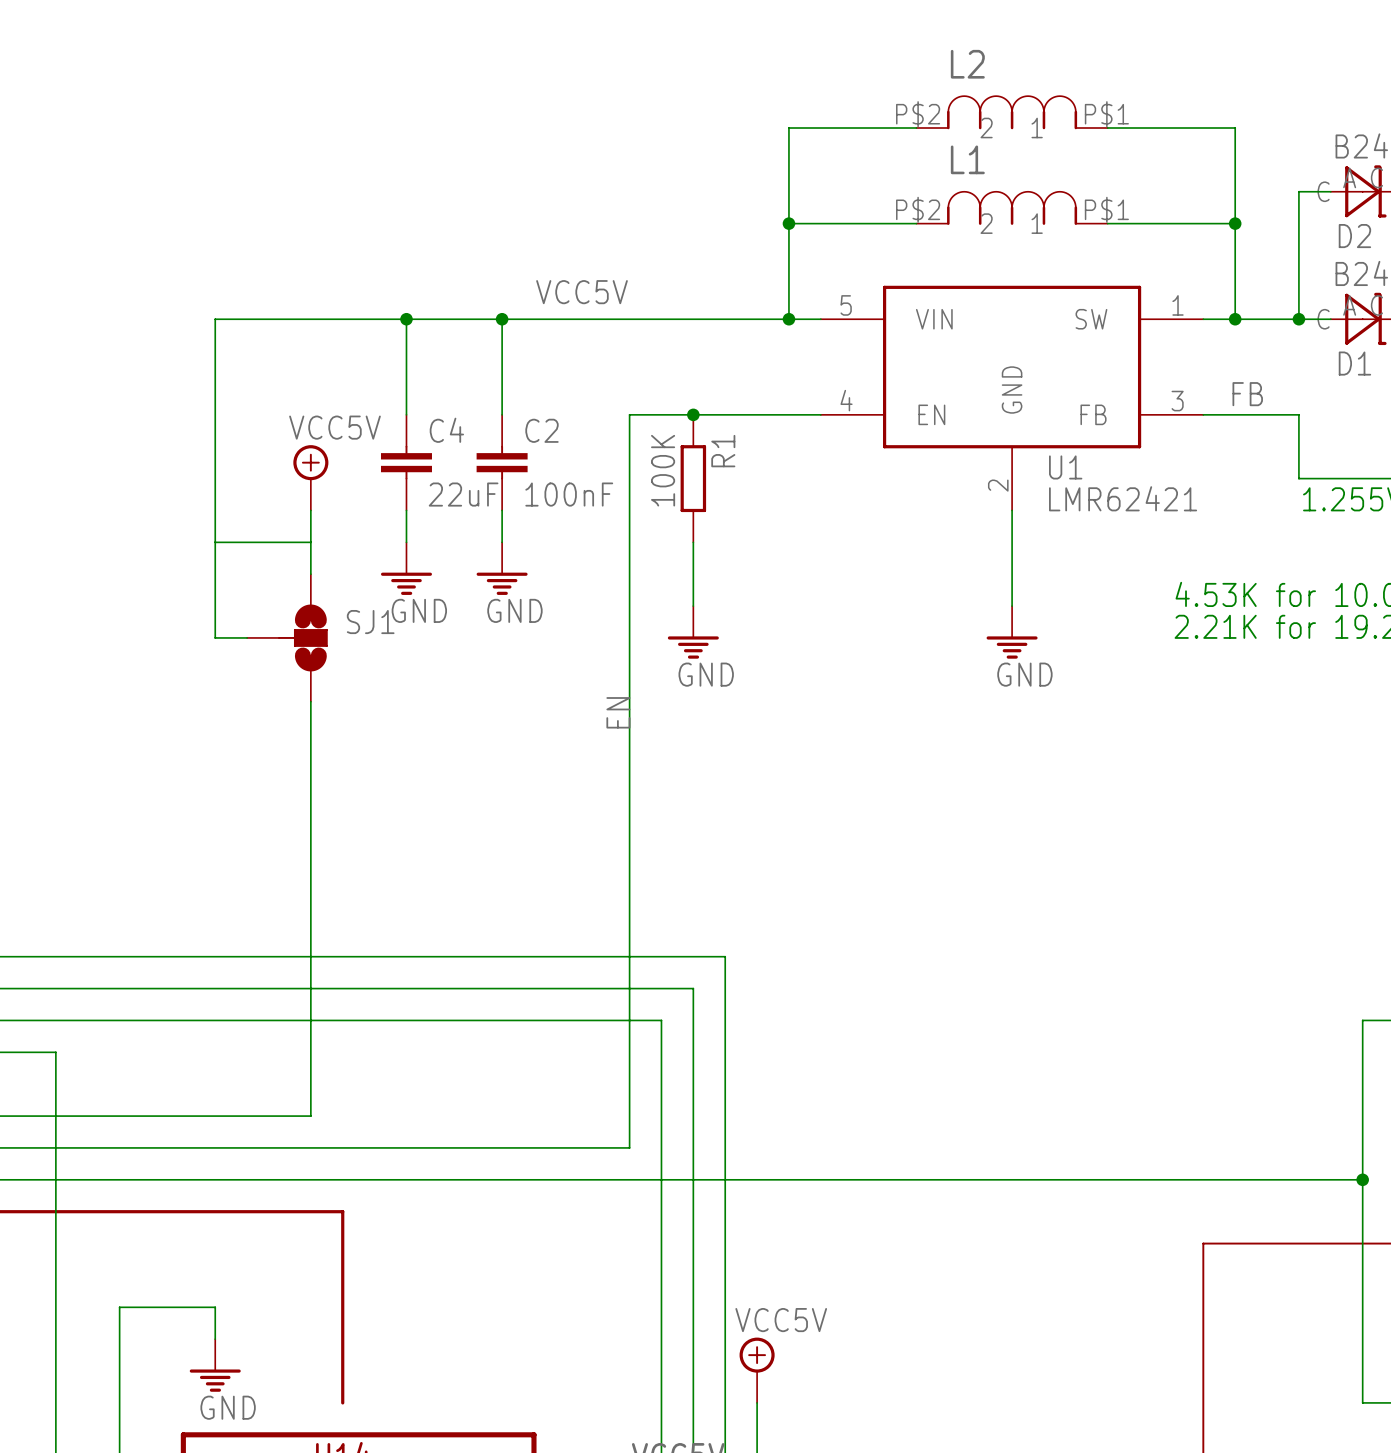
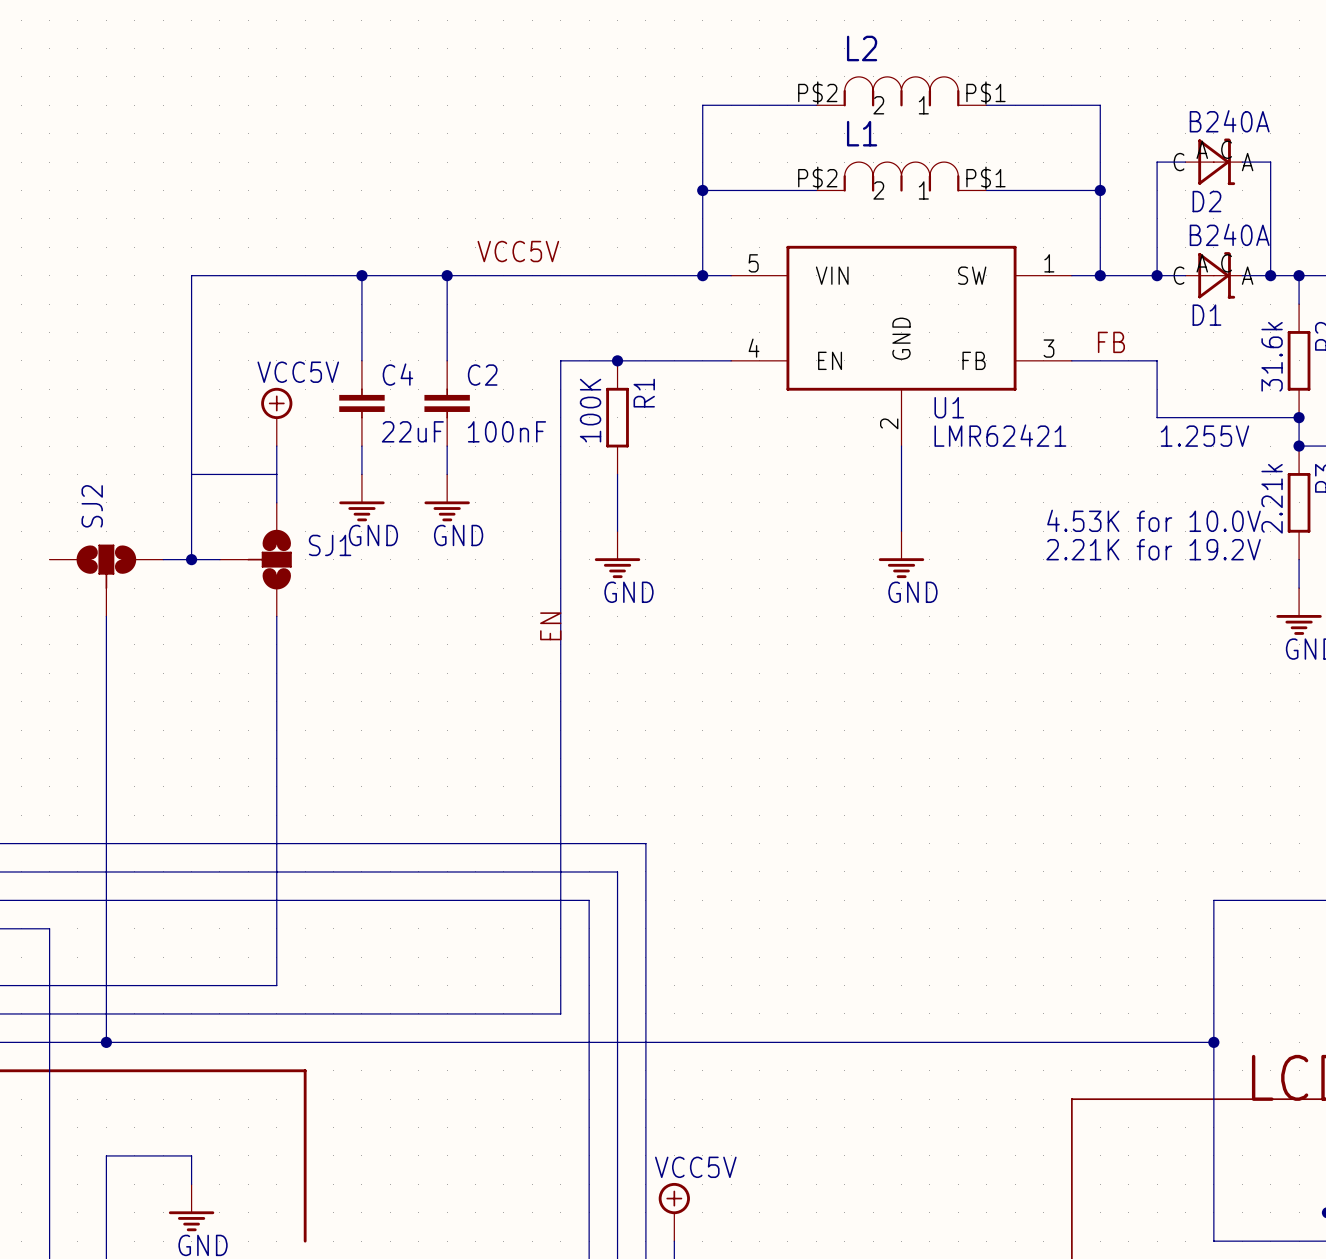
wire: none -> (163, 559) (191, 559)
junction: none -> (191, 559)
SJ2: none -> (106, 580)
wire: none -> (106, 616) (106, 1042)
junction: none -> (106, 1042)

